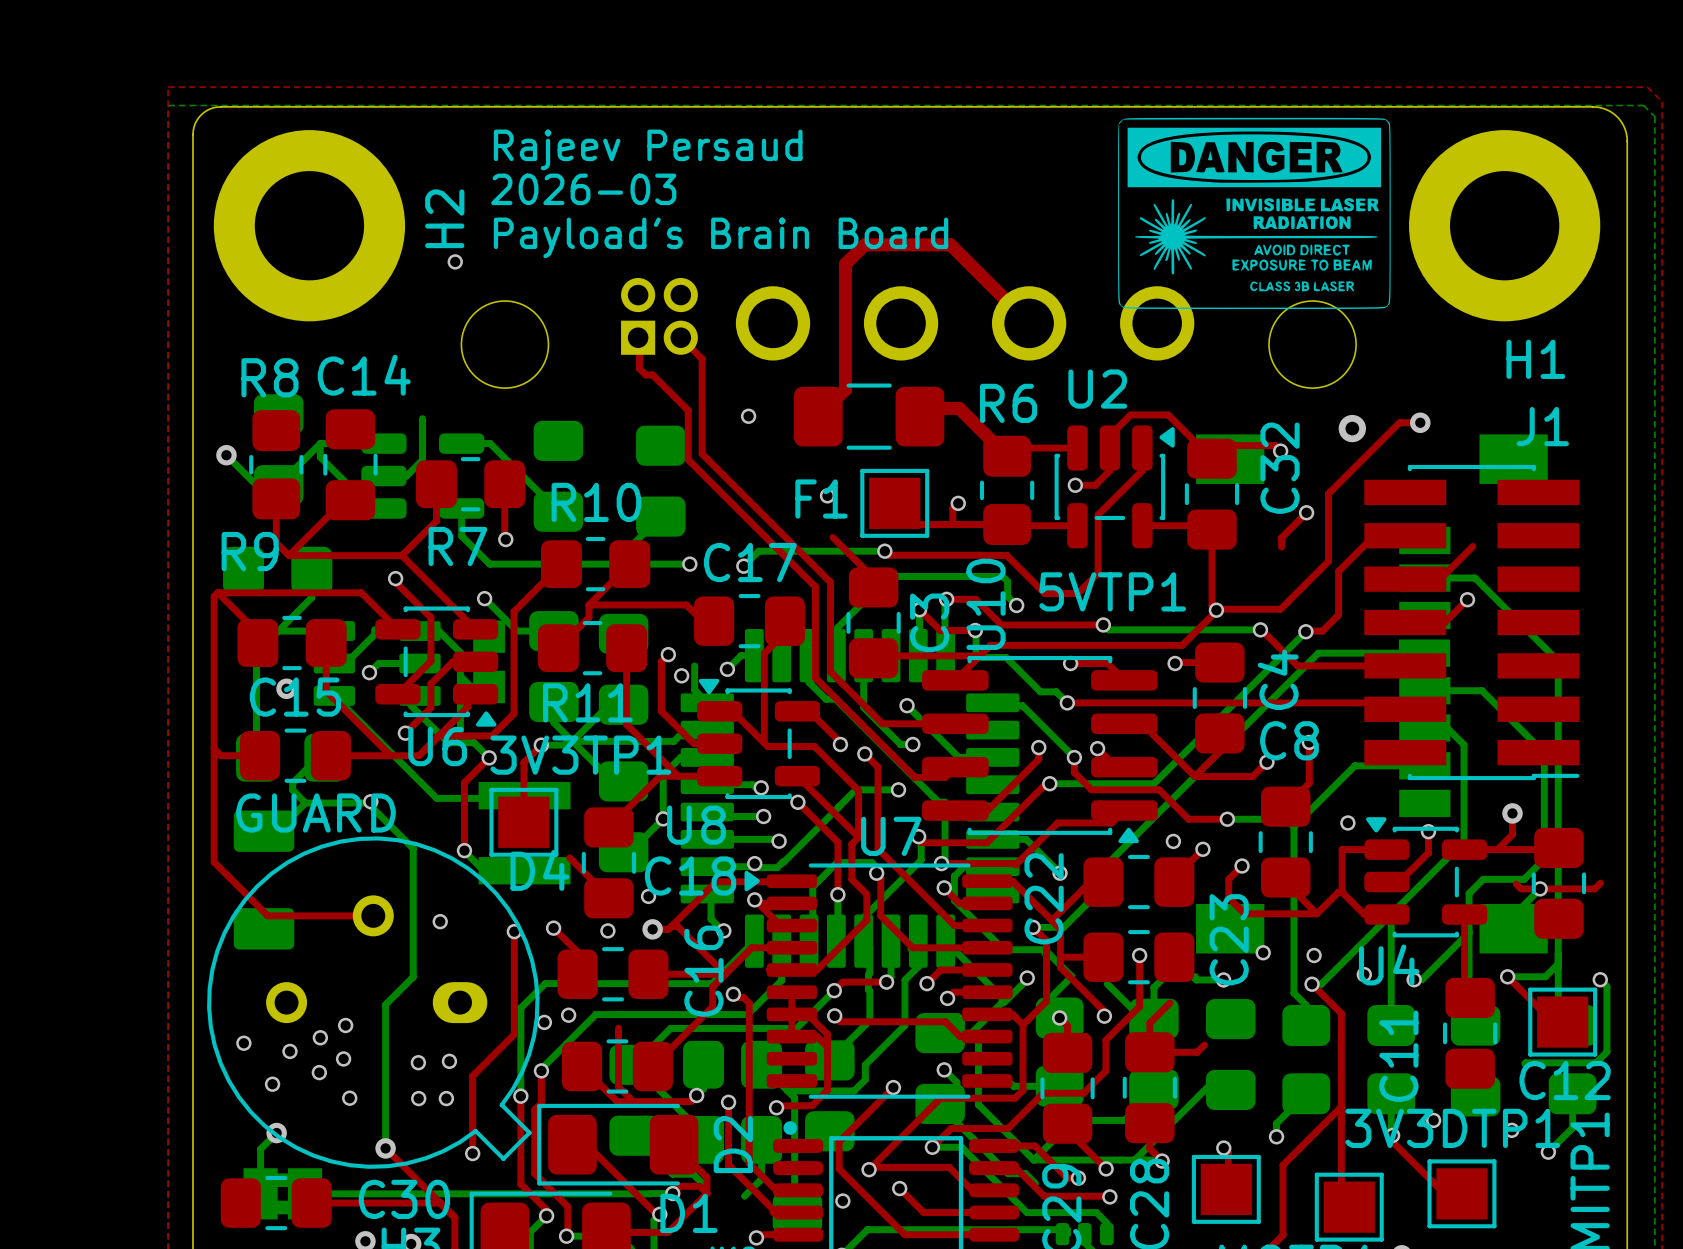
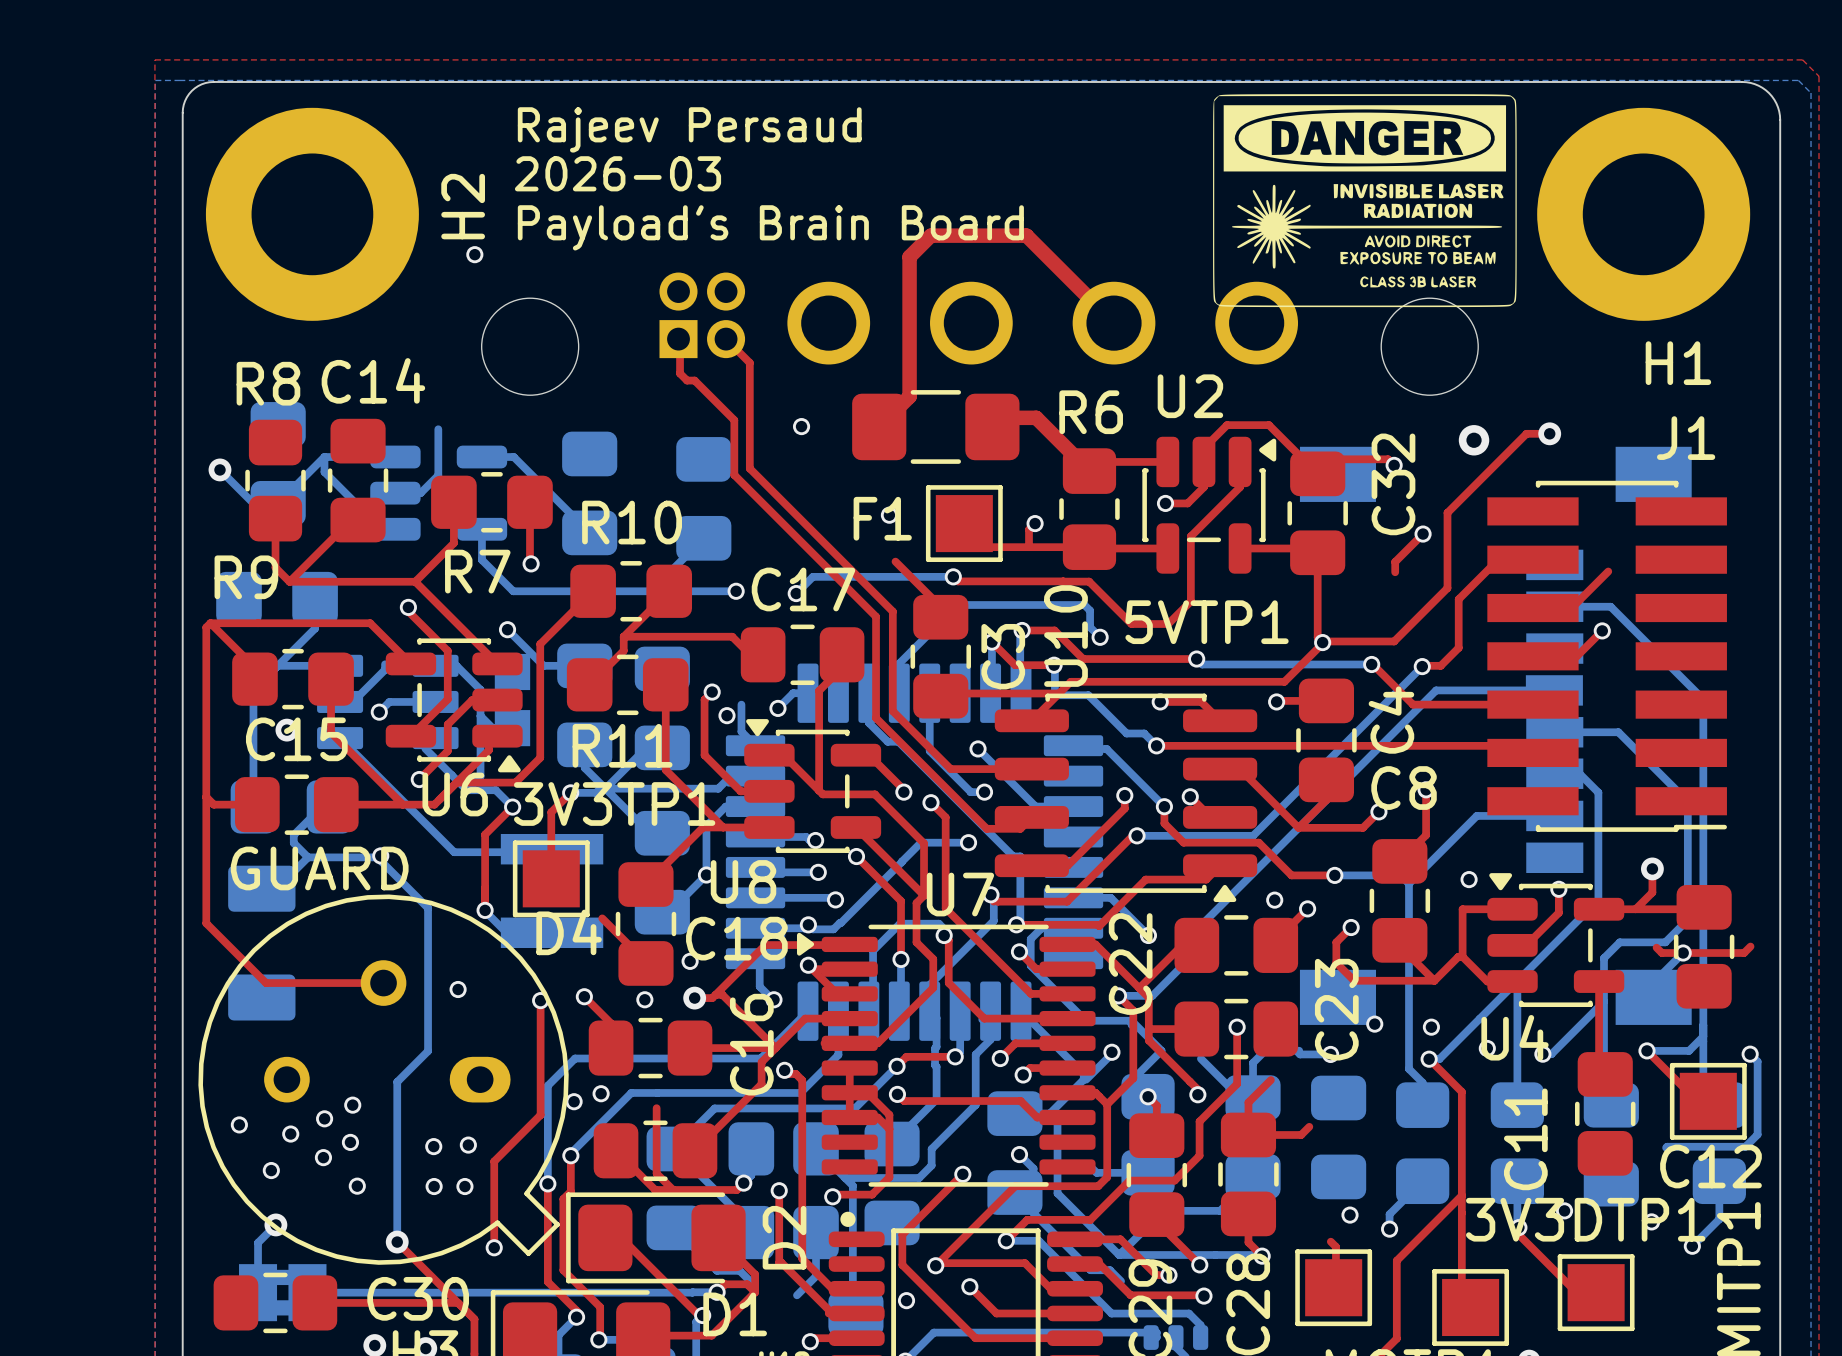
bottom track: (1230, 1083) (1210, 1083) (1134, 1160) -> none
via position: (1223, 1148) -> (1350, 1215)

